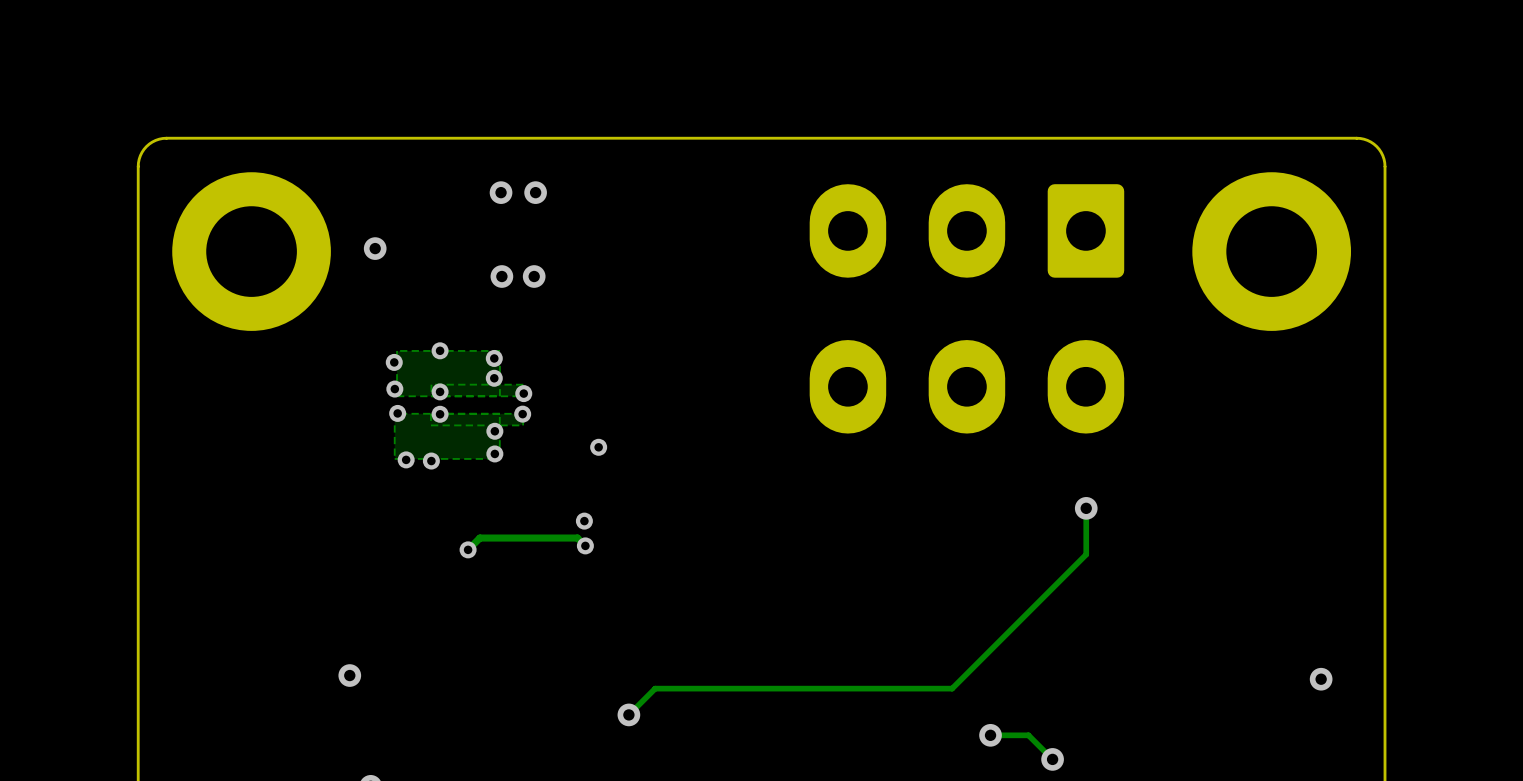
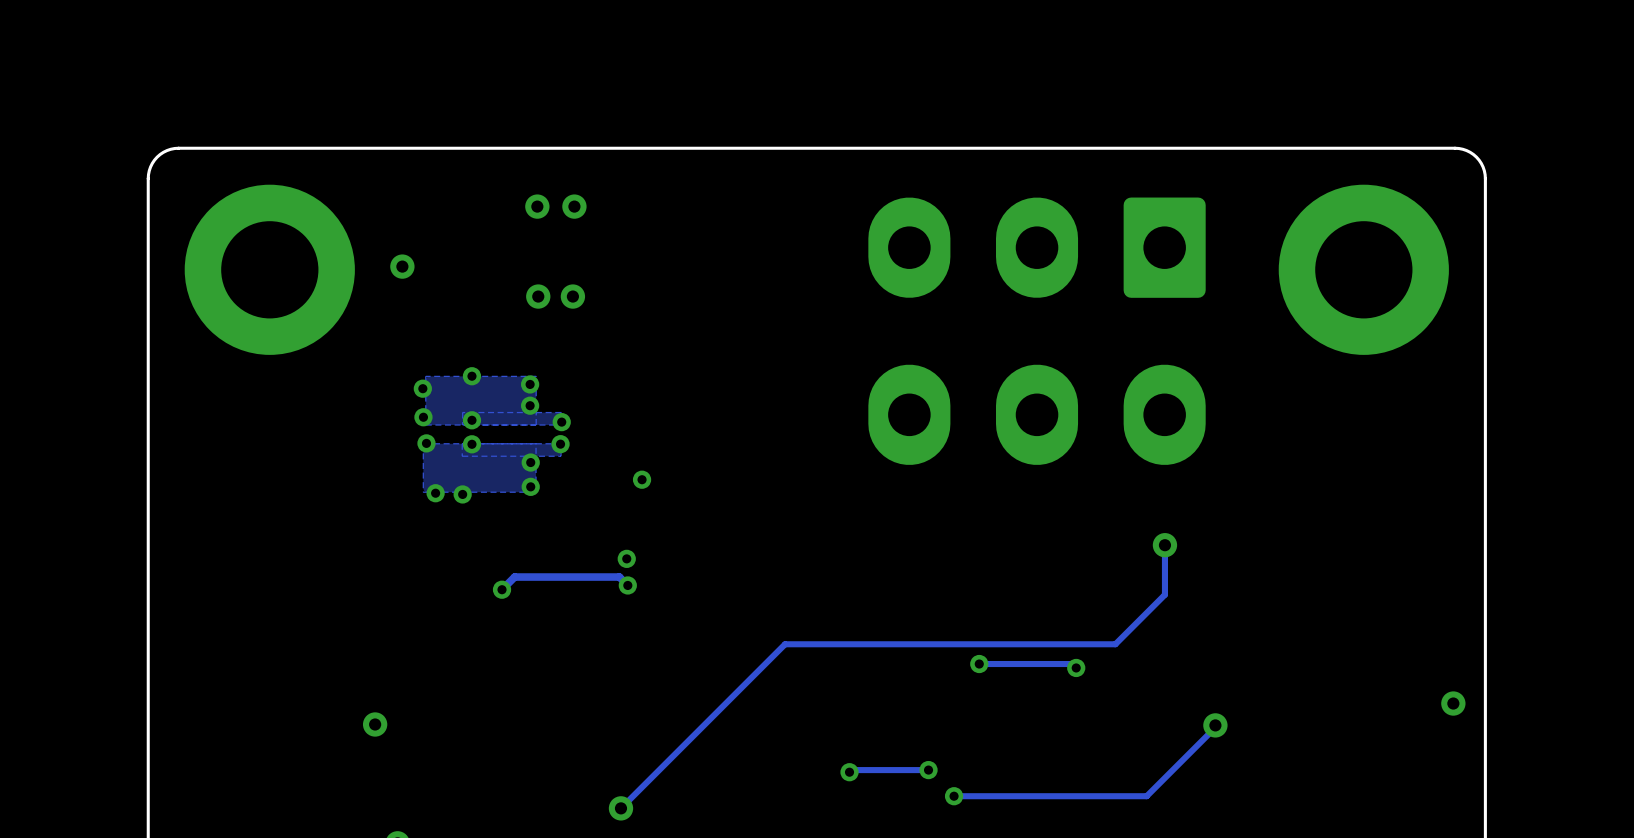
track: (1040, 600) (952, 688) (655, 688) (628, 714) -> (1115, 644) (785, 644) (620, 808)
track: none -> (979, 664) (1072, 664) (1076, 667)
via: none -> (979, 664)
via: none -> (1076, 667)
via: none -> (1215, 725)
track: none -> (1216, 726) (1215, 725) (1146, 796) (954, 796)
via position: (1321, 679) -> (1453, 703)
via: (628, 714) -> none
track: none -> (928, 770) (851, 770) (849, 772)
via: none -> (928, 770)
via: none -> (849, 772)
track: (990, 735) (1028, 735) (1052, 759) -> none
via: (990, 735) -> none
via: none -> (954, 796)
via: none -> (620, 808)
via: (1052, 759) -> none

